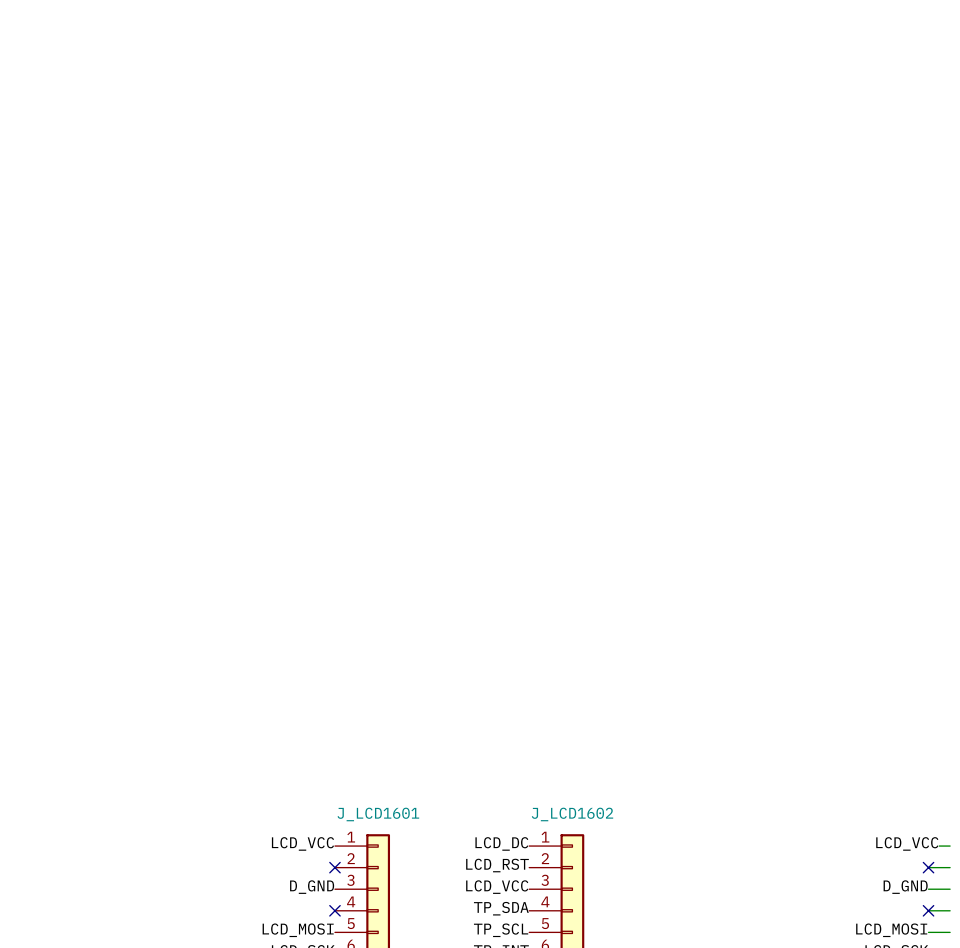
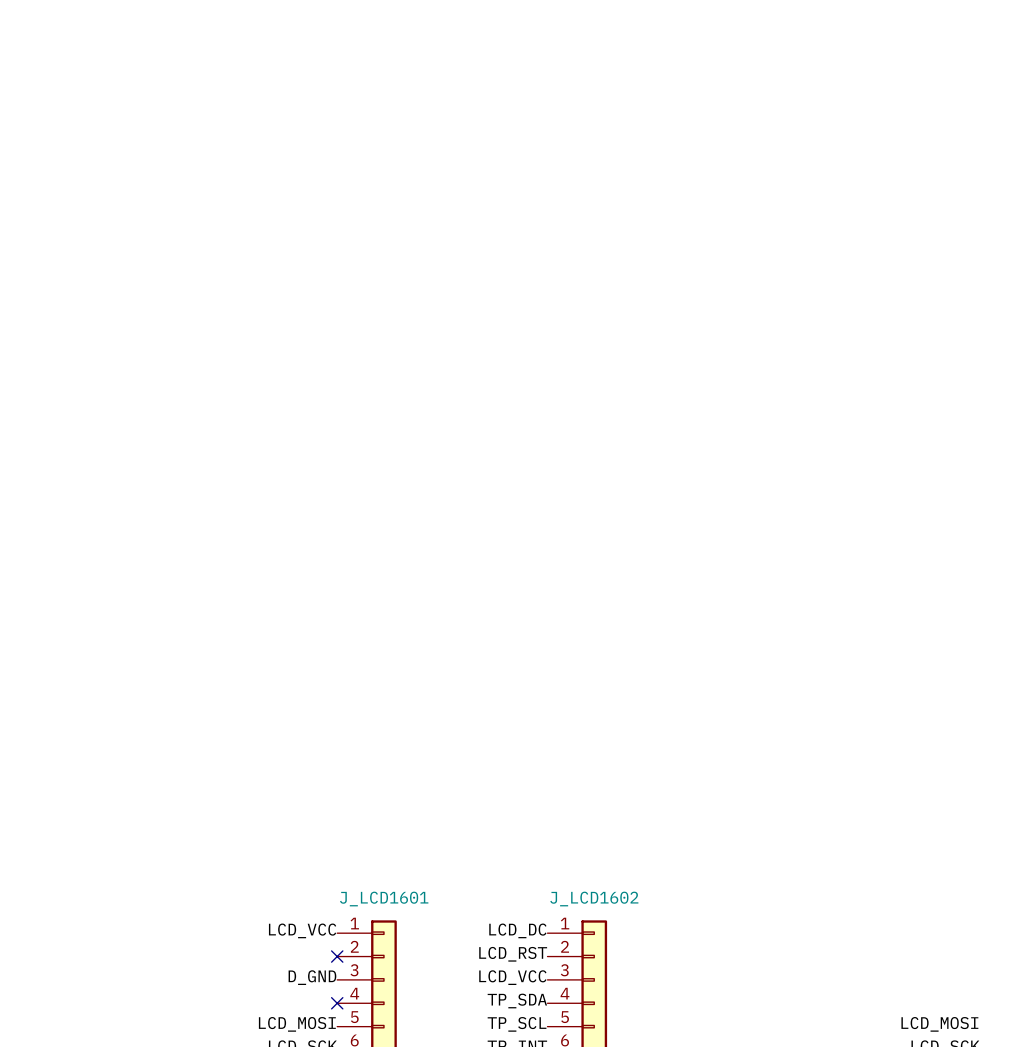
label: LCD_VCC (907, 843) -> none
wire: (939, 846) (950, 846) -> none
wire: (928, 867) (950, 867) -> none
no-connect mark: (928, 867) -> none
label: D_GND (905, 887) -> none
wire: (928, 889) (950, 889) -> none
wire: (928, 910) (950, 910) -> none
no-connect mark: (928, 910) -> none
wire: (928, 932) (950, 932) -> none

